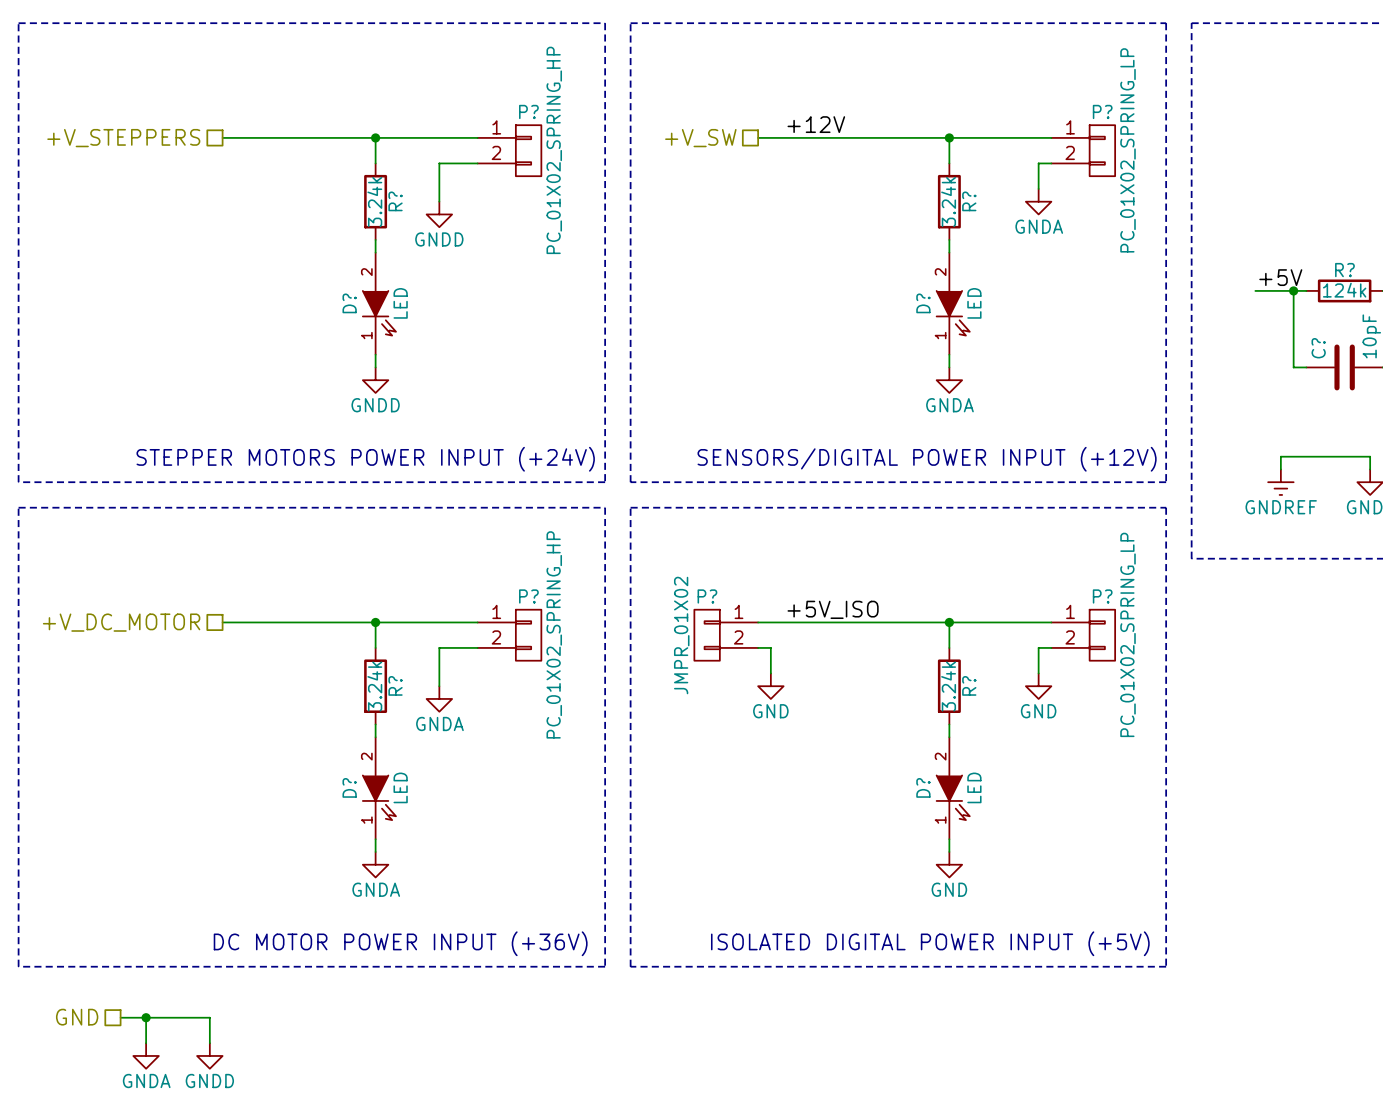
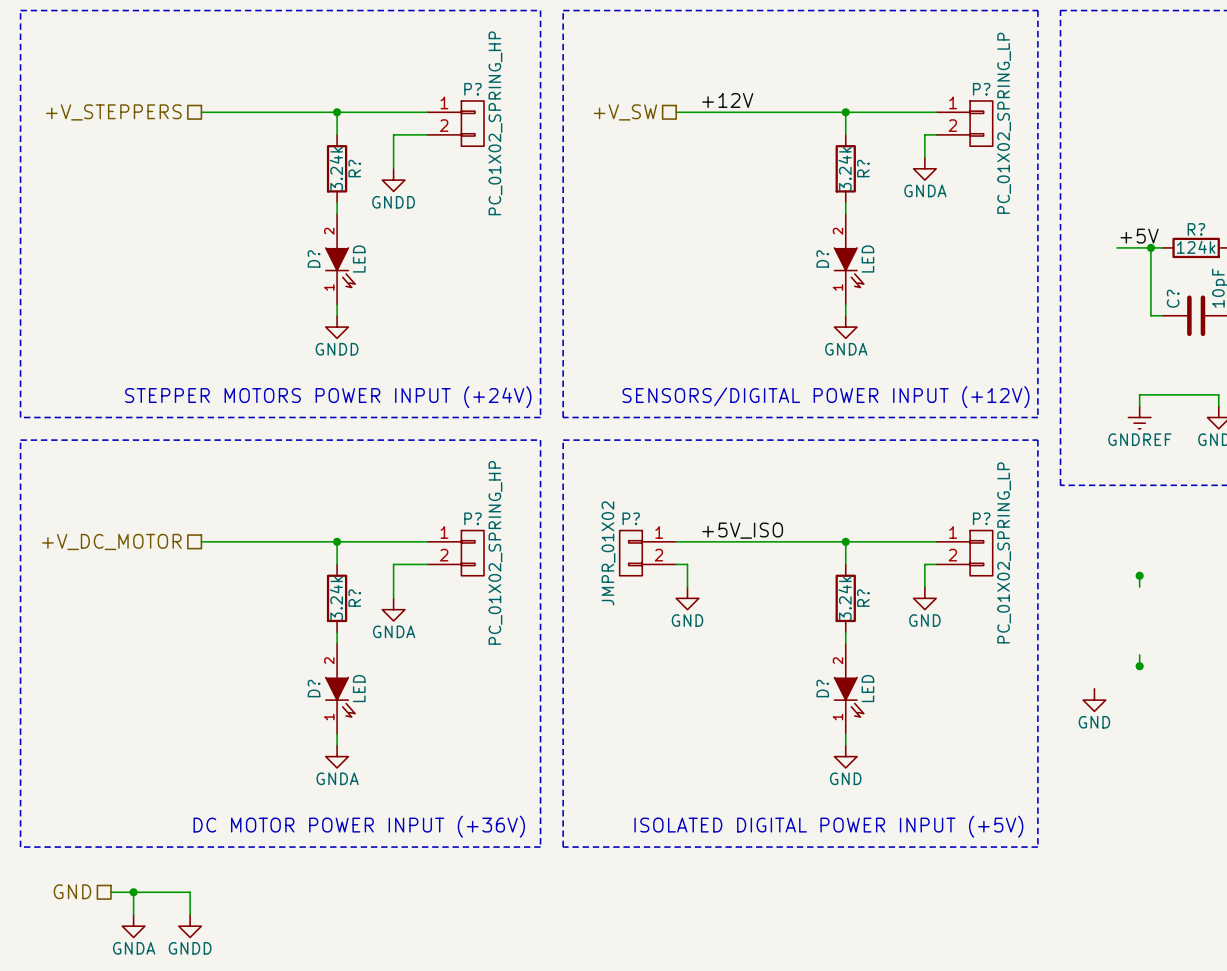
wire: none -> (1139, 575) (1139, 587)
junction: none -> (1139, 575)
wire: none -> (1139, 654) (1139, 666)
junction: none -> (1139, 666)
power symbol: none -> GND (1094, 700)

